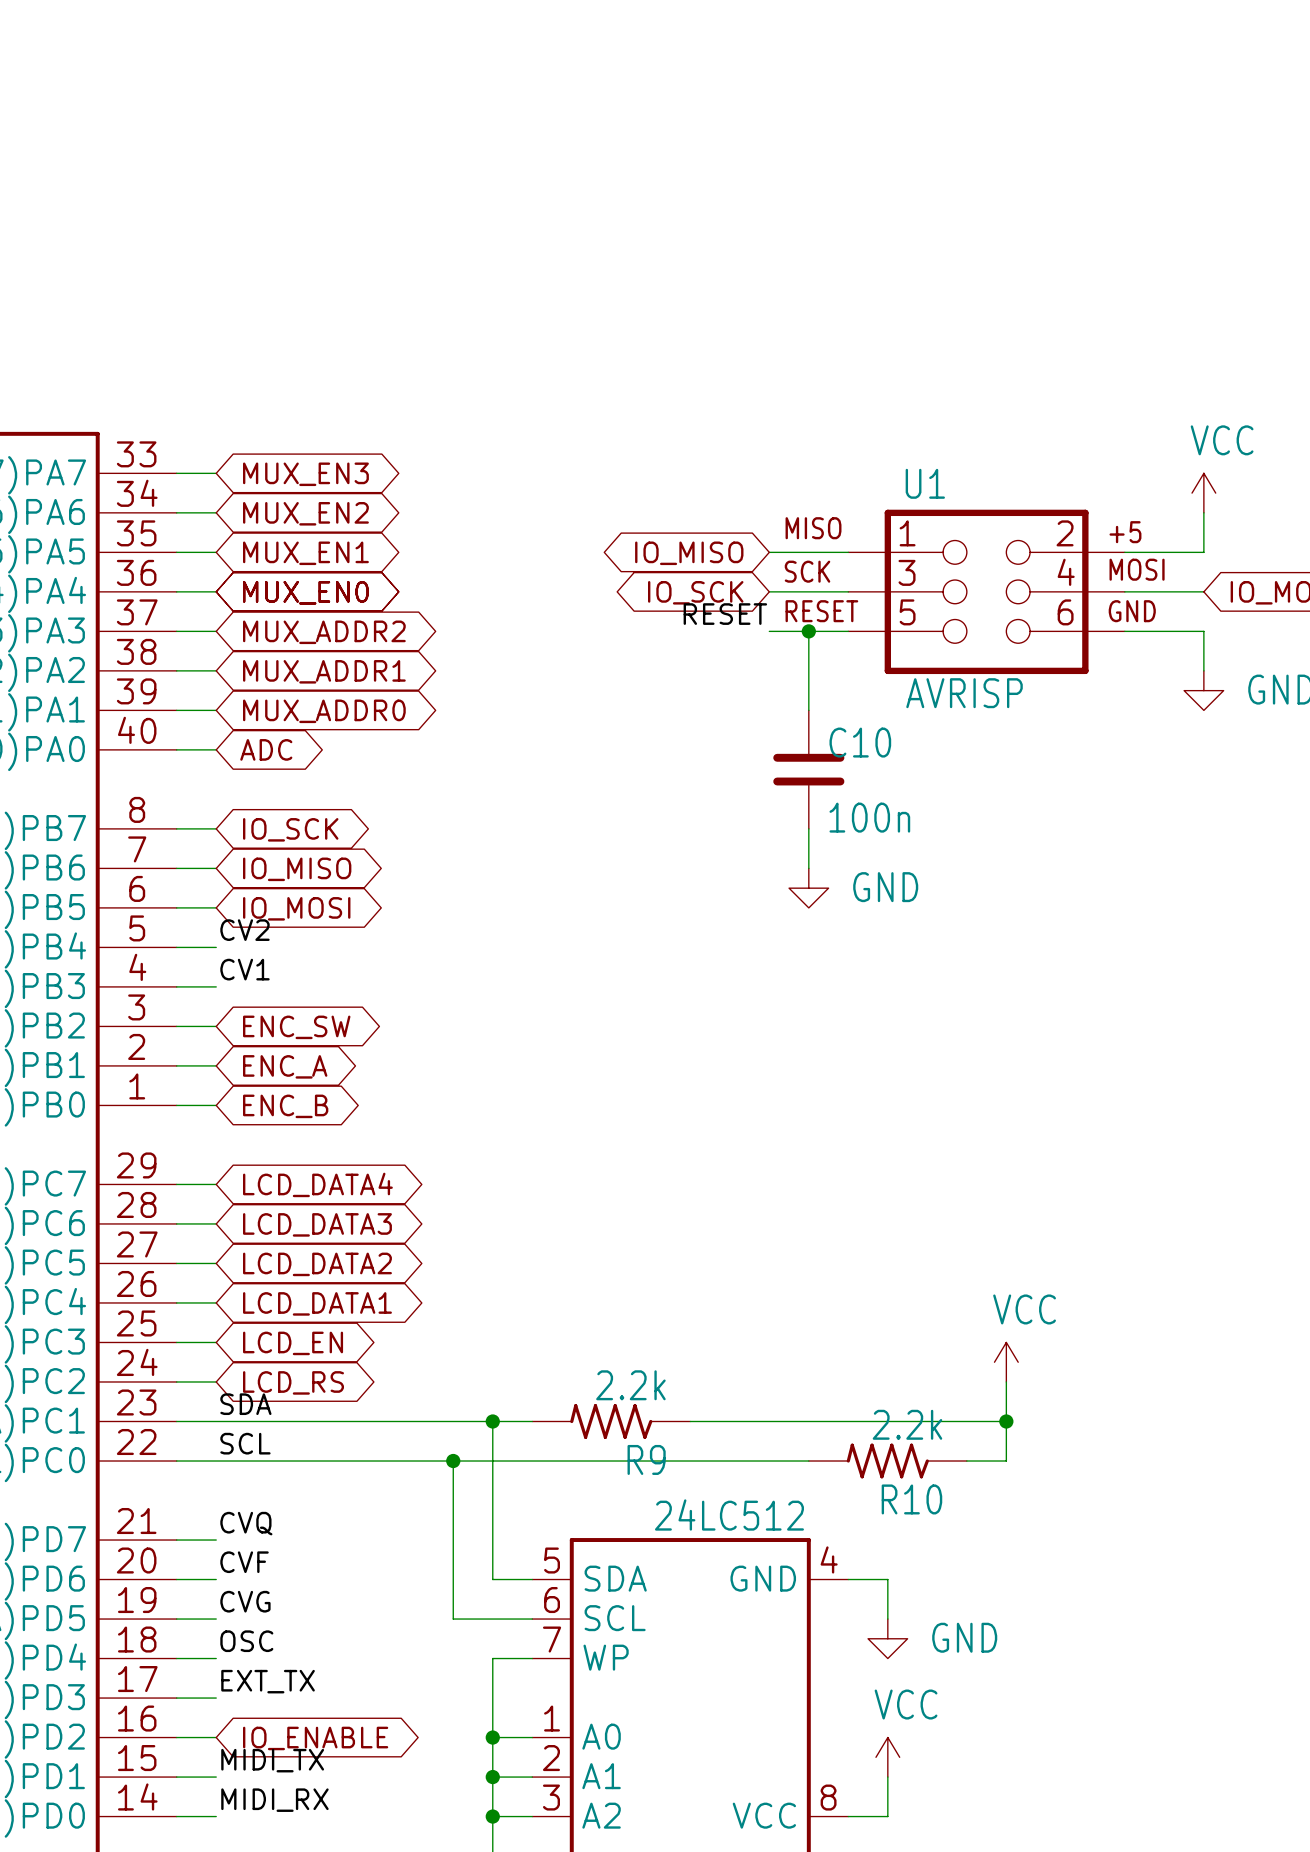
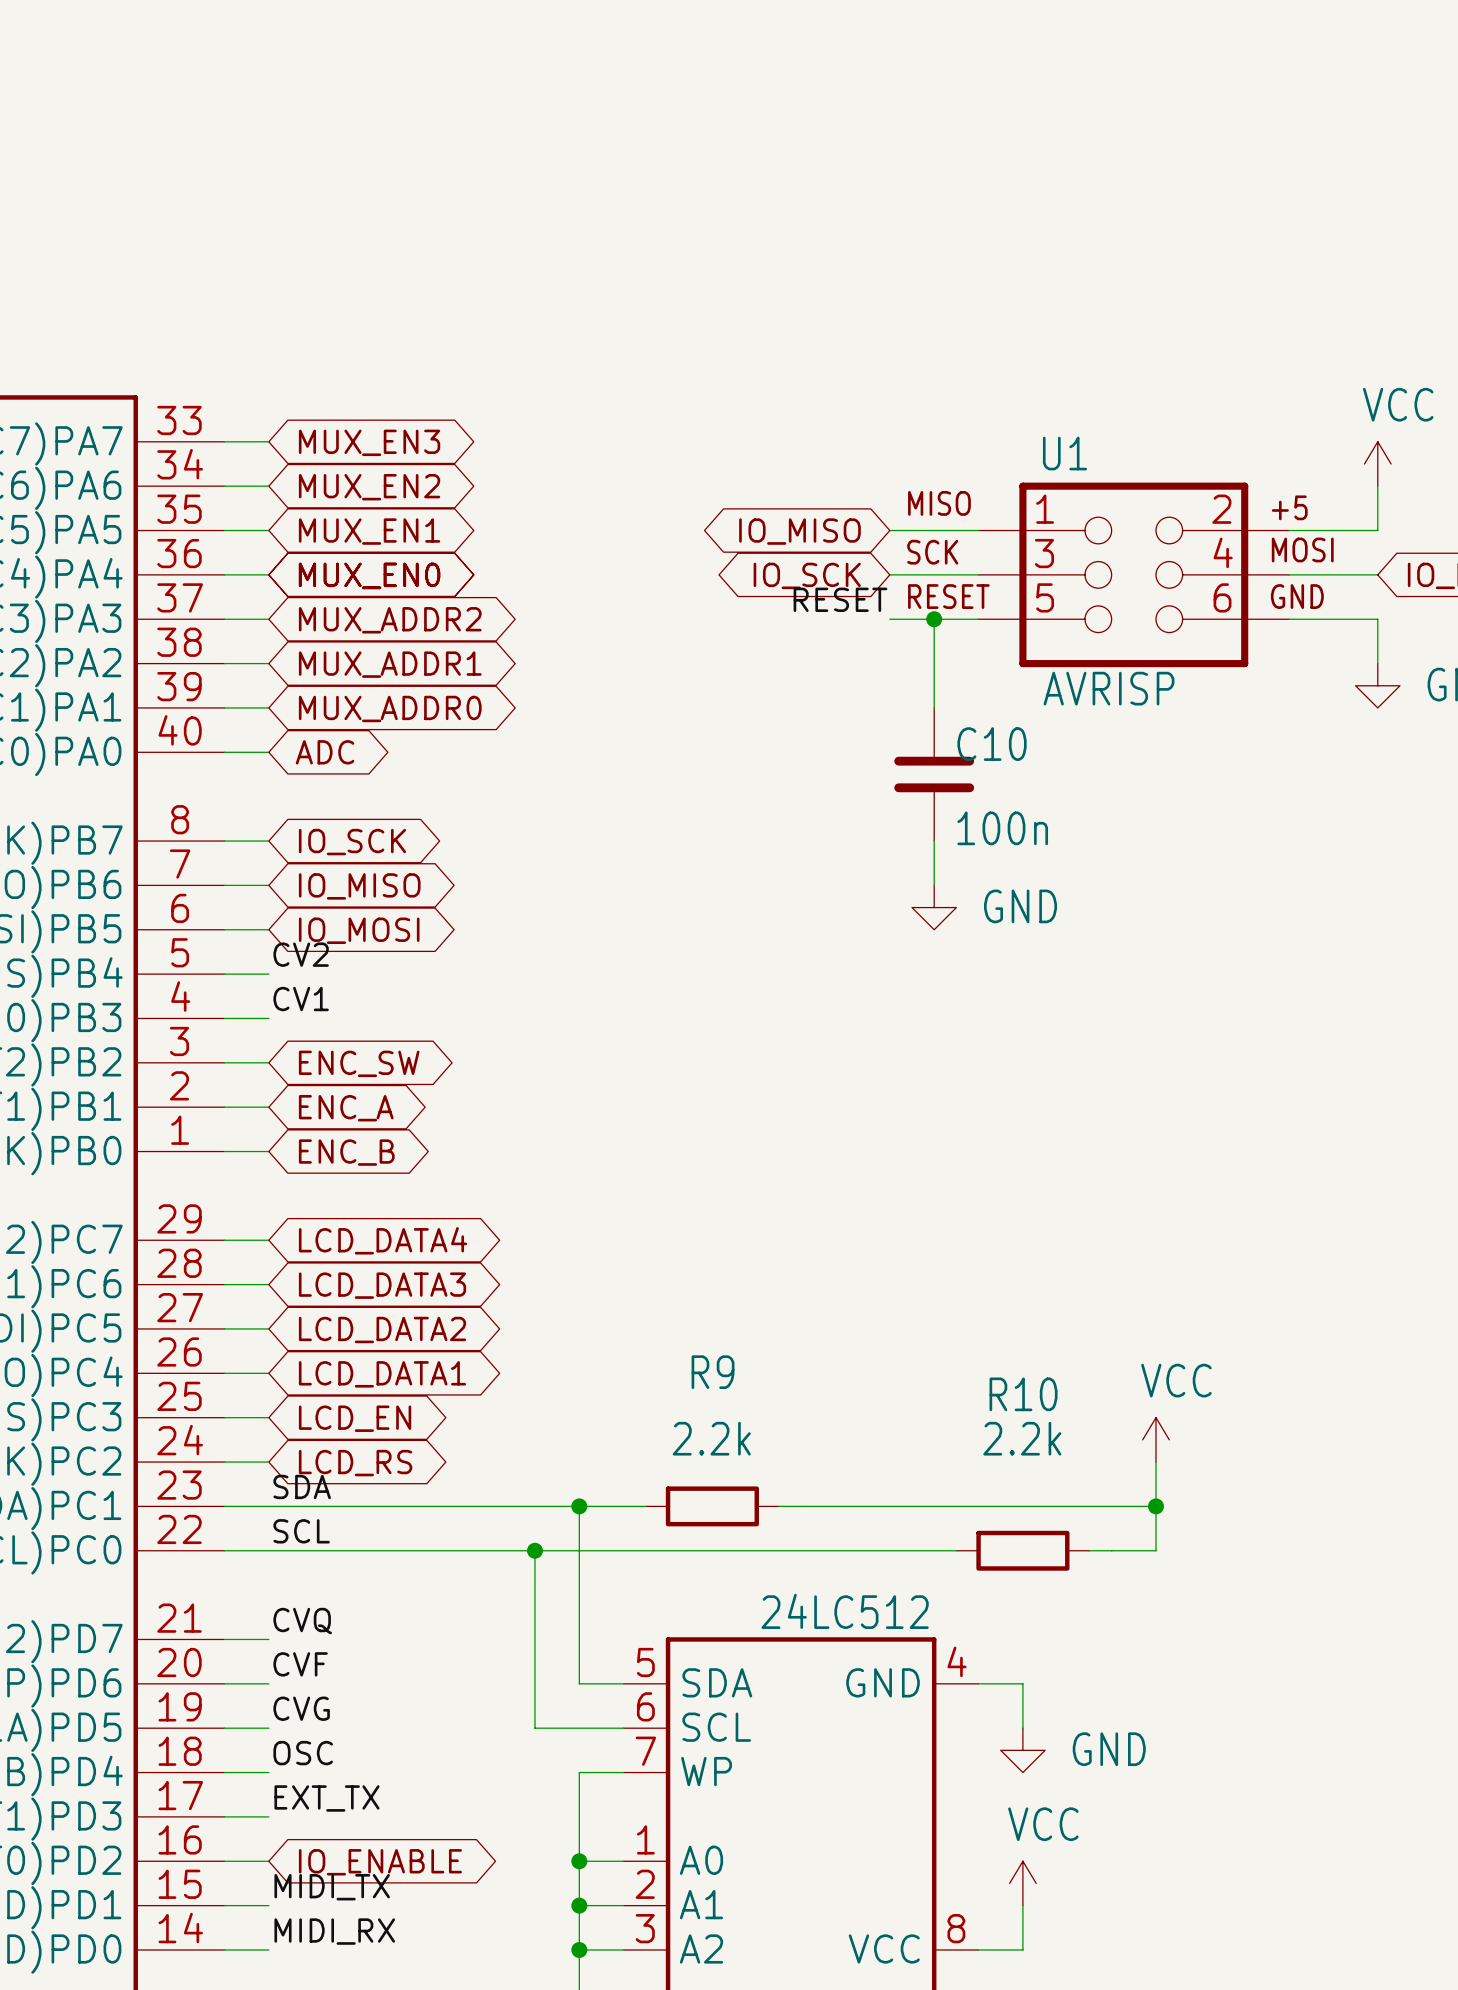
R9 symbol: [532, 1404, 691, 1439] -> [645, 1486, 779, 1527]
R10 value position: 2.2k (907, 1424) -> 2.2k (1022, 1438)
R10 symbol: [808, 1443, 967, 1479] -> [956, 1530, 1090, 1571]
R9 name position: R9 (646, 1459) -> R9 (713, 1372)
R10 name position: R10 (911, 1499) -> R10 (1023, 1394)

